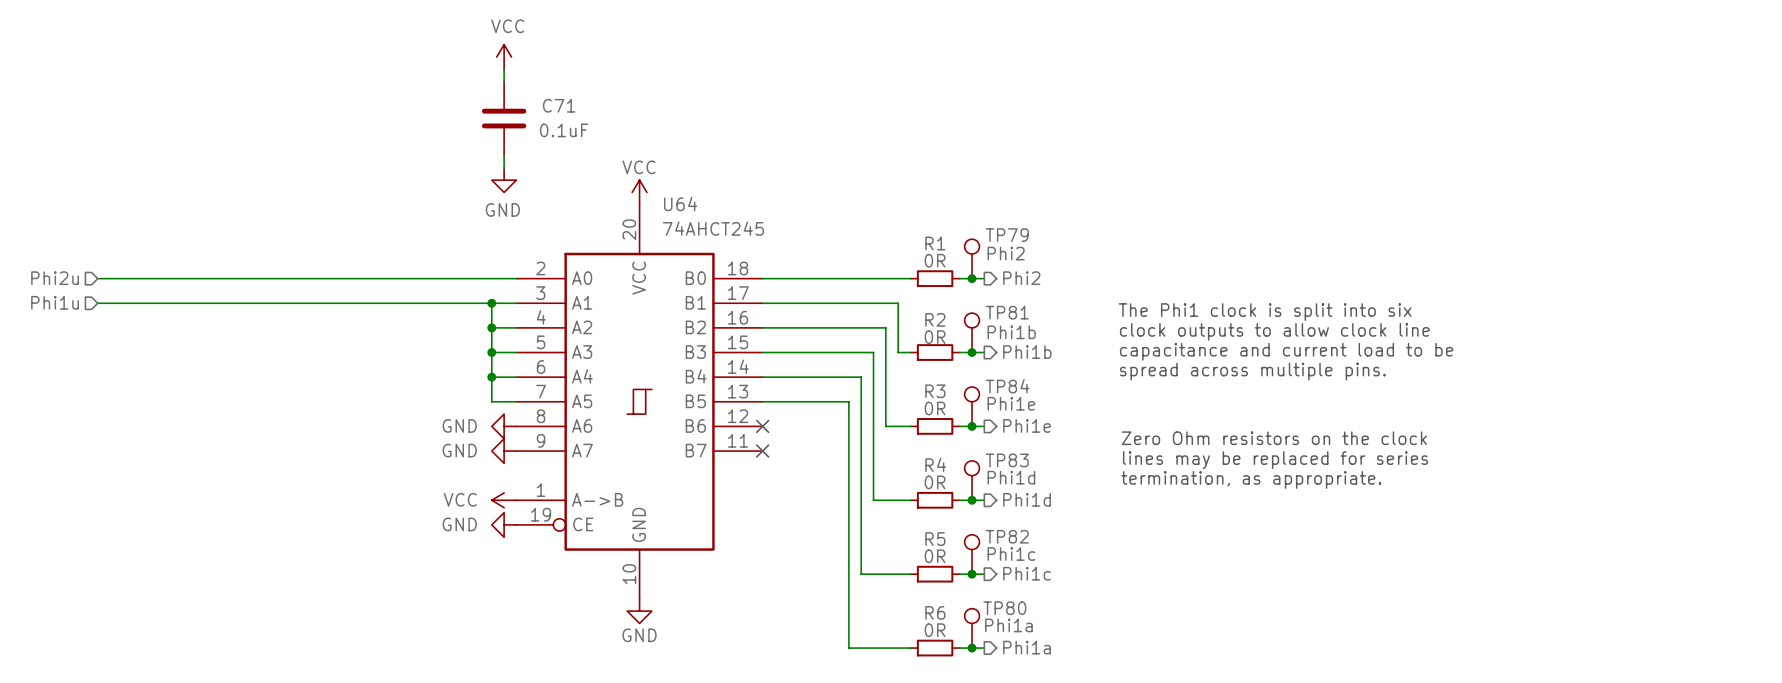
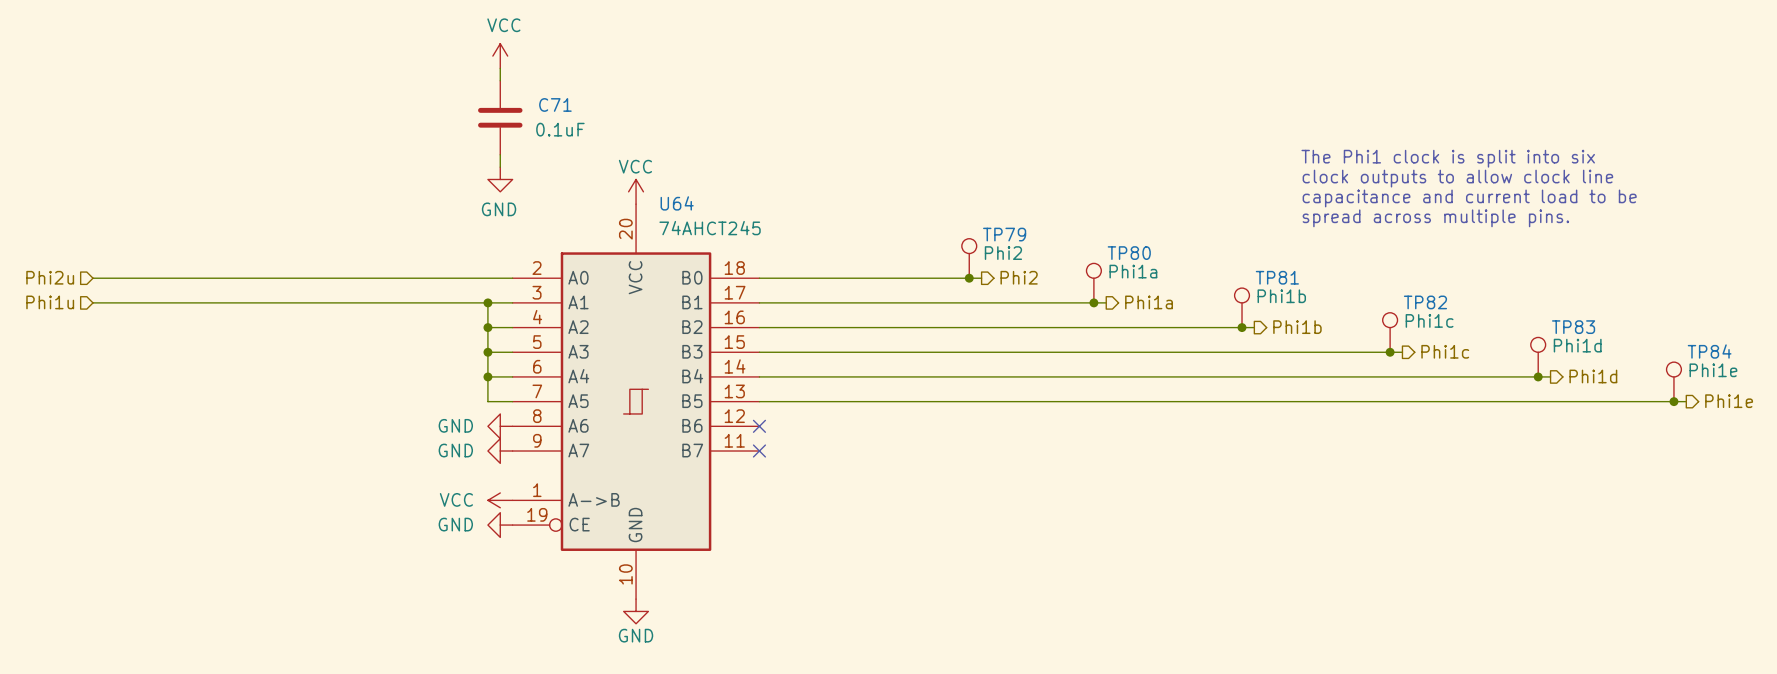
wire: none -> (907, 278) (956, 278)
R1: 0R (935, 278) -> none
hierarchical label: none -> Phi1a (1149, 302)
wire: (898, 303) (898, 352) -> (870, 352) (895, 352)
wire: none -> (895, 302) (1106, 302)
junction: none -> (1093, 302)
TP81 name position: TP81 (1007, 312) -> TP81 (1277, 277)
text position: The Phi1 clock is split into six (1265, 312) -> The Phi1 clock is split into six (1448, 158)
wire: (885, 327) (885, 426) (910, 426) -> (882, 327) (1254, 327)
junction: none -> (1242, 327)
hierarchical label: none -> Phi1b (1297, 327)
text position: clock outputs to allow clock line (1274, 331) -> clock outputs to allow clock line (1457, 178)
TP81 position: (972, 332) -> (1242, 307)
TP81 value position: Phi1b (1011, 332) -> Phi1b (1281, 296)
text position: capacitance and current load to be (1286, 351) -> capacitance and current load to be (1469, 198)
wire: (873, 352) (873, 500) (910, 500) -> none
wire: none -> (907, 352) (956, 352)
R2: 0R (935, 352) -> none
junction: (972, 352) -> none
wire: none -> (981, 352) (1402, 352)
hierarchical label: Phi1b (1027, 352) -> none
junction: none -> (1390, 352)
hierarchical label: none -> Phi1c (1445, 351)
text position: spread across multiple pins. (1252, 371) -> spread across multiple pins. (1435, 218)
hierarchical label: none -> Phi1d (1593, 376)
wire: (861, 377) (861, 574) (910, 574) -> (858, 376) (1550, 376)
junction: none -> (1538, 376)
TP84 name position: TP84 (1007, 386) -> TP84 (1709, 351)
wire: (848, 401) (848, 648) (910, 648) -> (845, 401) (1686, 401)
junction: none -> (1673, 401)
hierarchical label: none -> Phi1e (1729, 401)
TP84 value position: Phi1e (1011, 403) -> Phi1e (1713, 370)
TP84 position: (972, 406) -> (1673, 381)
hierarchical label: Phi1e (1027, 425) -> none
R3: 0R (935, 426) -> none
wire: (959, 426) (984, 426) -> none
junction: (972, 426) -> none
text: Zero Ohm resistors on the clock (1274, 438) -> none
TP83 name position: TP83 (1007, 460) -> TP83 (1573, 327)
text: lines may be replaced for series (1275, 460) -> none
TP83 value position: Phi1d (1011, 477) -> Phi1d (1577, 345)
text: termination, as appropriate. (1251, 479) -> none
TP83 position: (972, 480) -> (1538, 357)
hierarchical label: Phi1d (1027, 499) -> none
R4: 0R (935, 500) -> none
wire: (959, 500) (984, 500) -> none
junction: (972, 500) -> none
TP82 name position: TP82 (1007, 536) -> TP82 (1425, 302)
TP82 position: (972, 554) -> (1390, 332)
TP82 value position: Phi1c (1011, 554) -> Phi1c (1429, 320)
hierarchical label: Phi1c (1027, 573) -> none
R5: 0R (935, 574) -> none
wire: (959, 574) (984, 574) -> none
junction: (972, 574) -> none
TP80 name position: TP80 (1004, 608) -> TP80 (1129, 253)
TP80 value position: Phi1a (1008, 625) -> Phi1a (1133, 271)
TP80 position: (972, 628) -> (1093, 283)
hierarchical label: Phi1a (1027, 647) -> none
R6: 0R (935, 648) -> none
wire: (959, 648) (984, 648) -> none
junction: (972, 648) -> none

